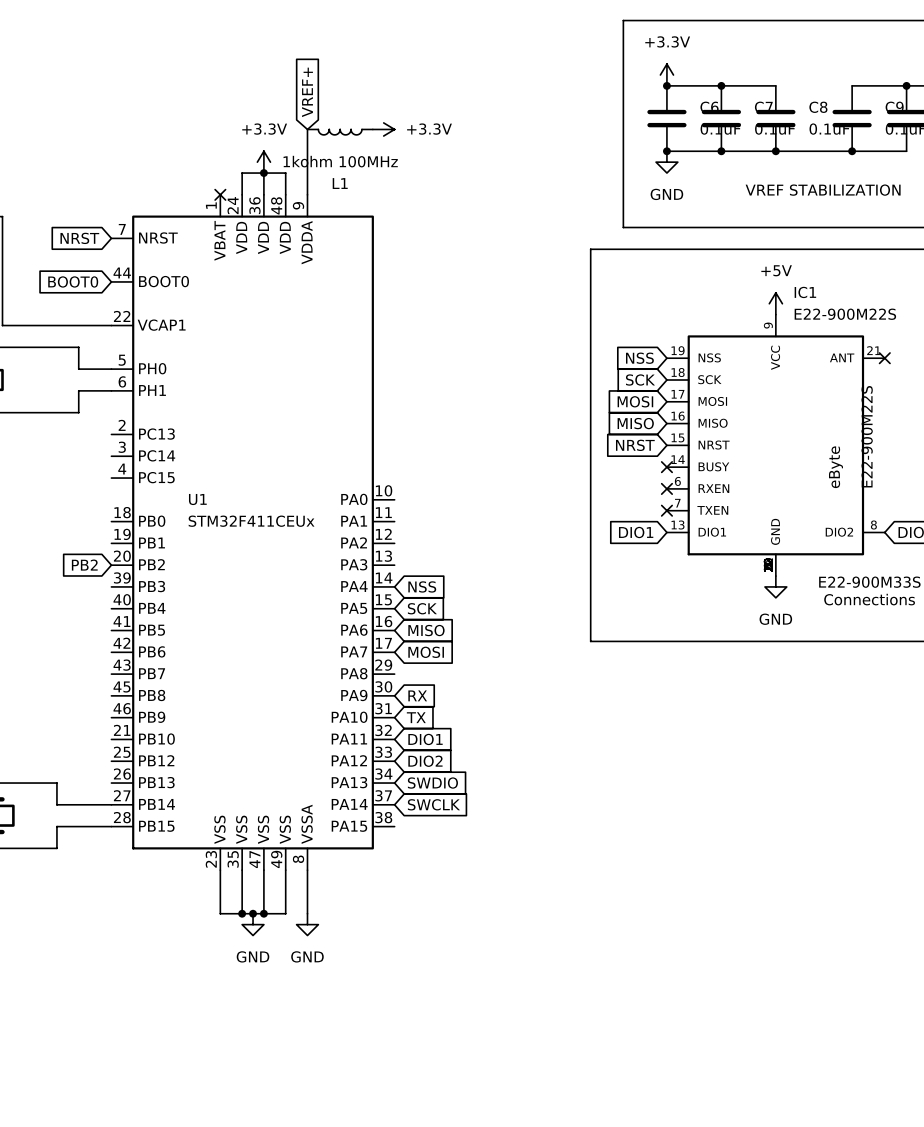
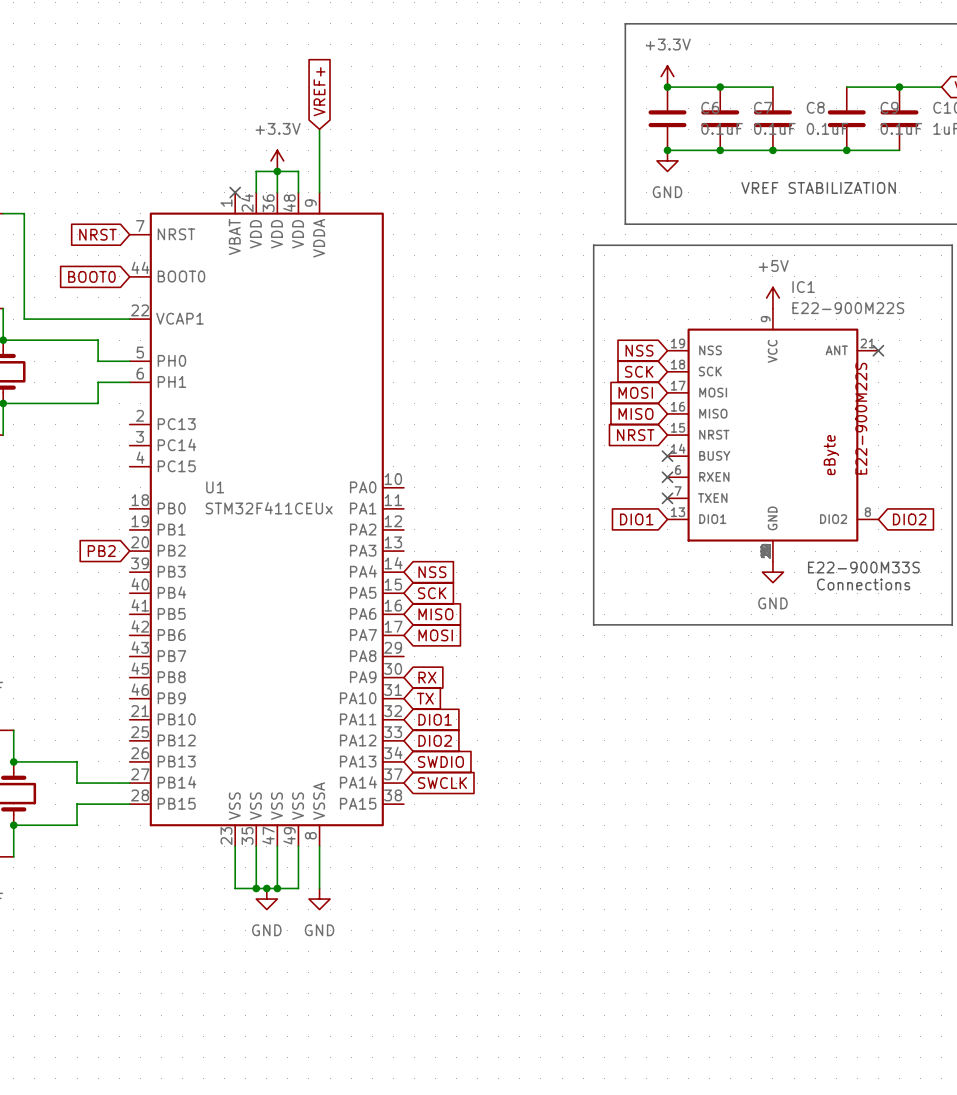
power symbol: +3.3V (383, 129) -> none
L1: 1kohm 100MHz (340, 132) -> none

